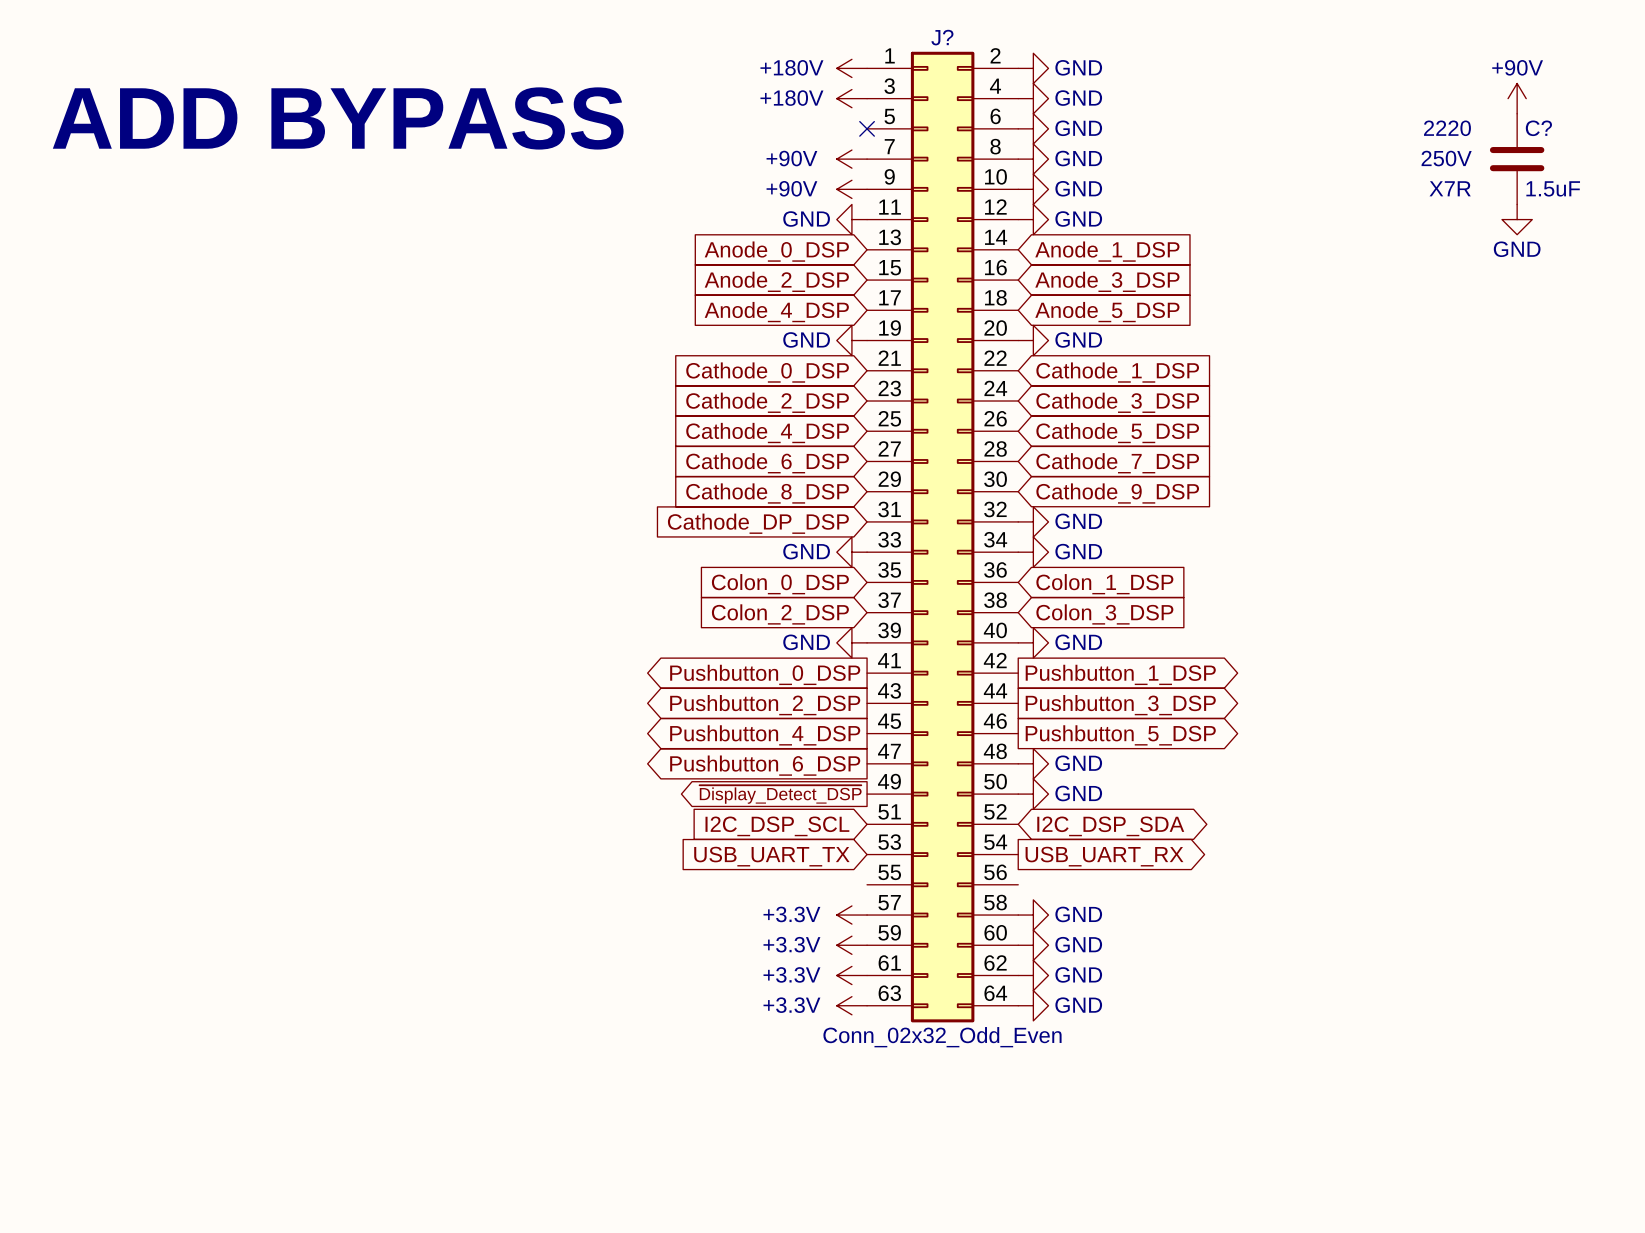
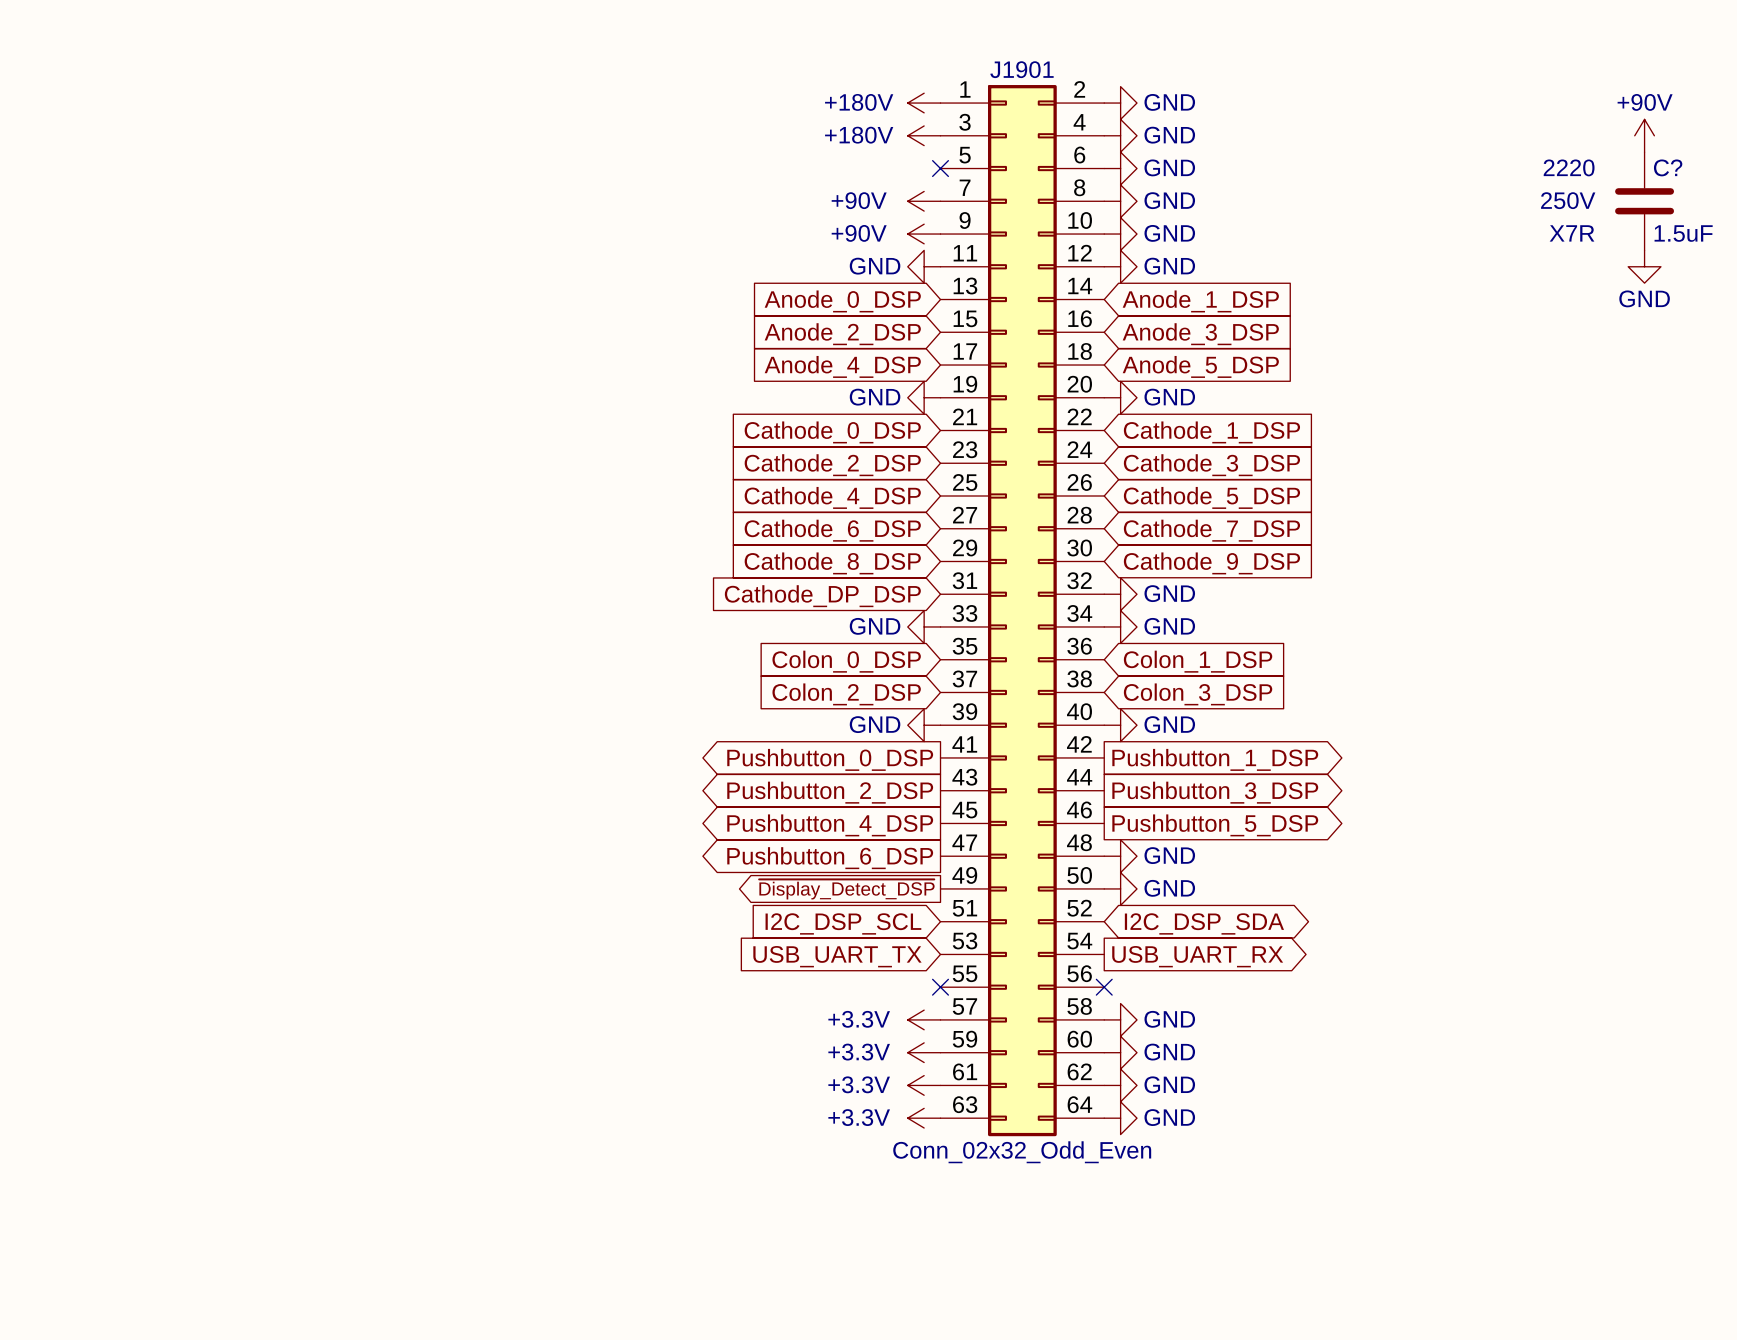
J? name: J? (942, 37) -> J1901 (1021, 69)
text: ADD BYPASS (338, 118) -> none
no-connect mark: none -> (940, 987)
no-connect mark: none -> (1104, 987)

